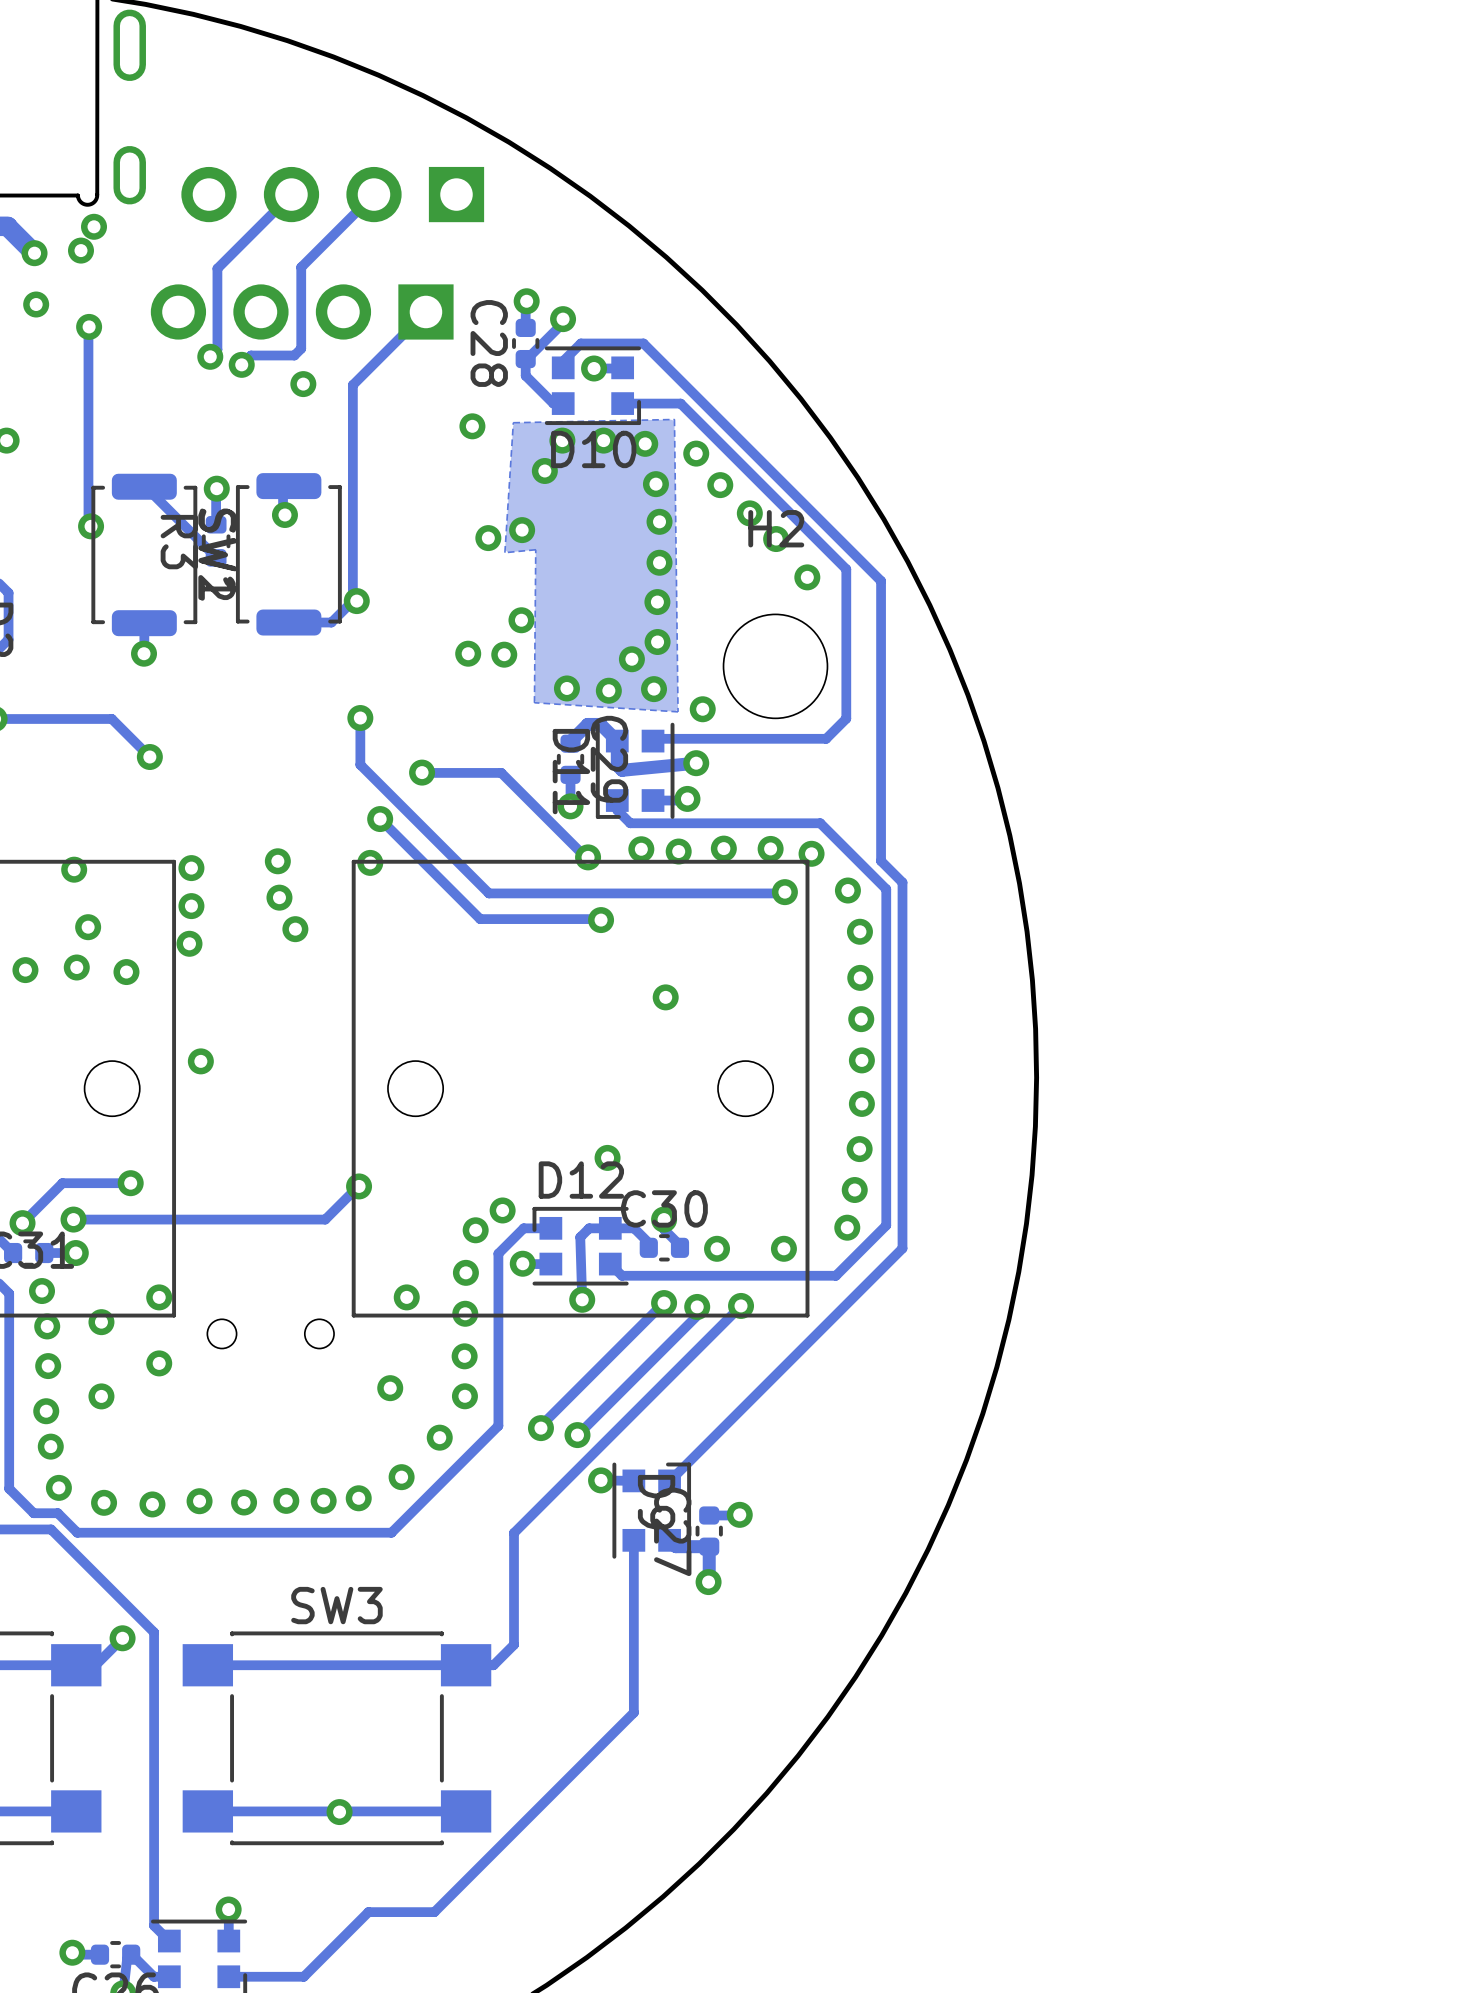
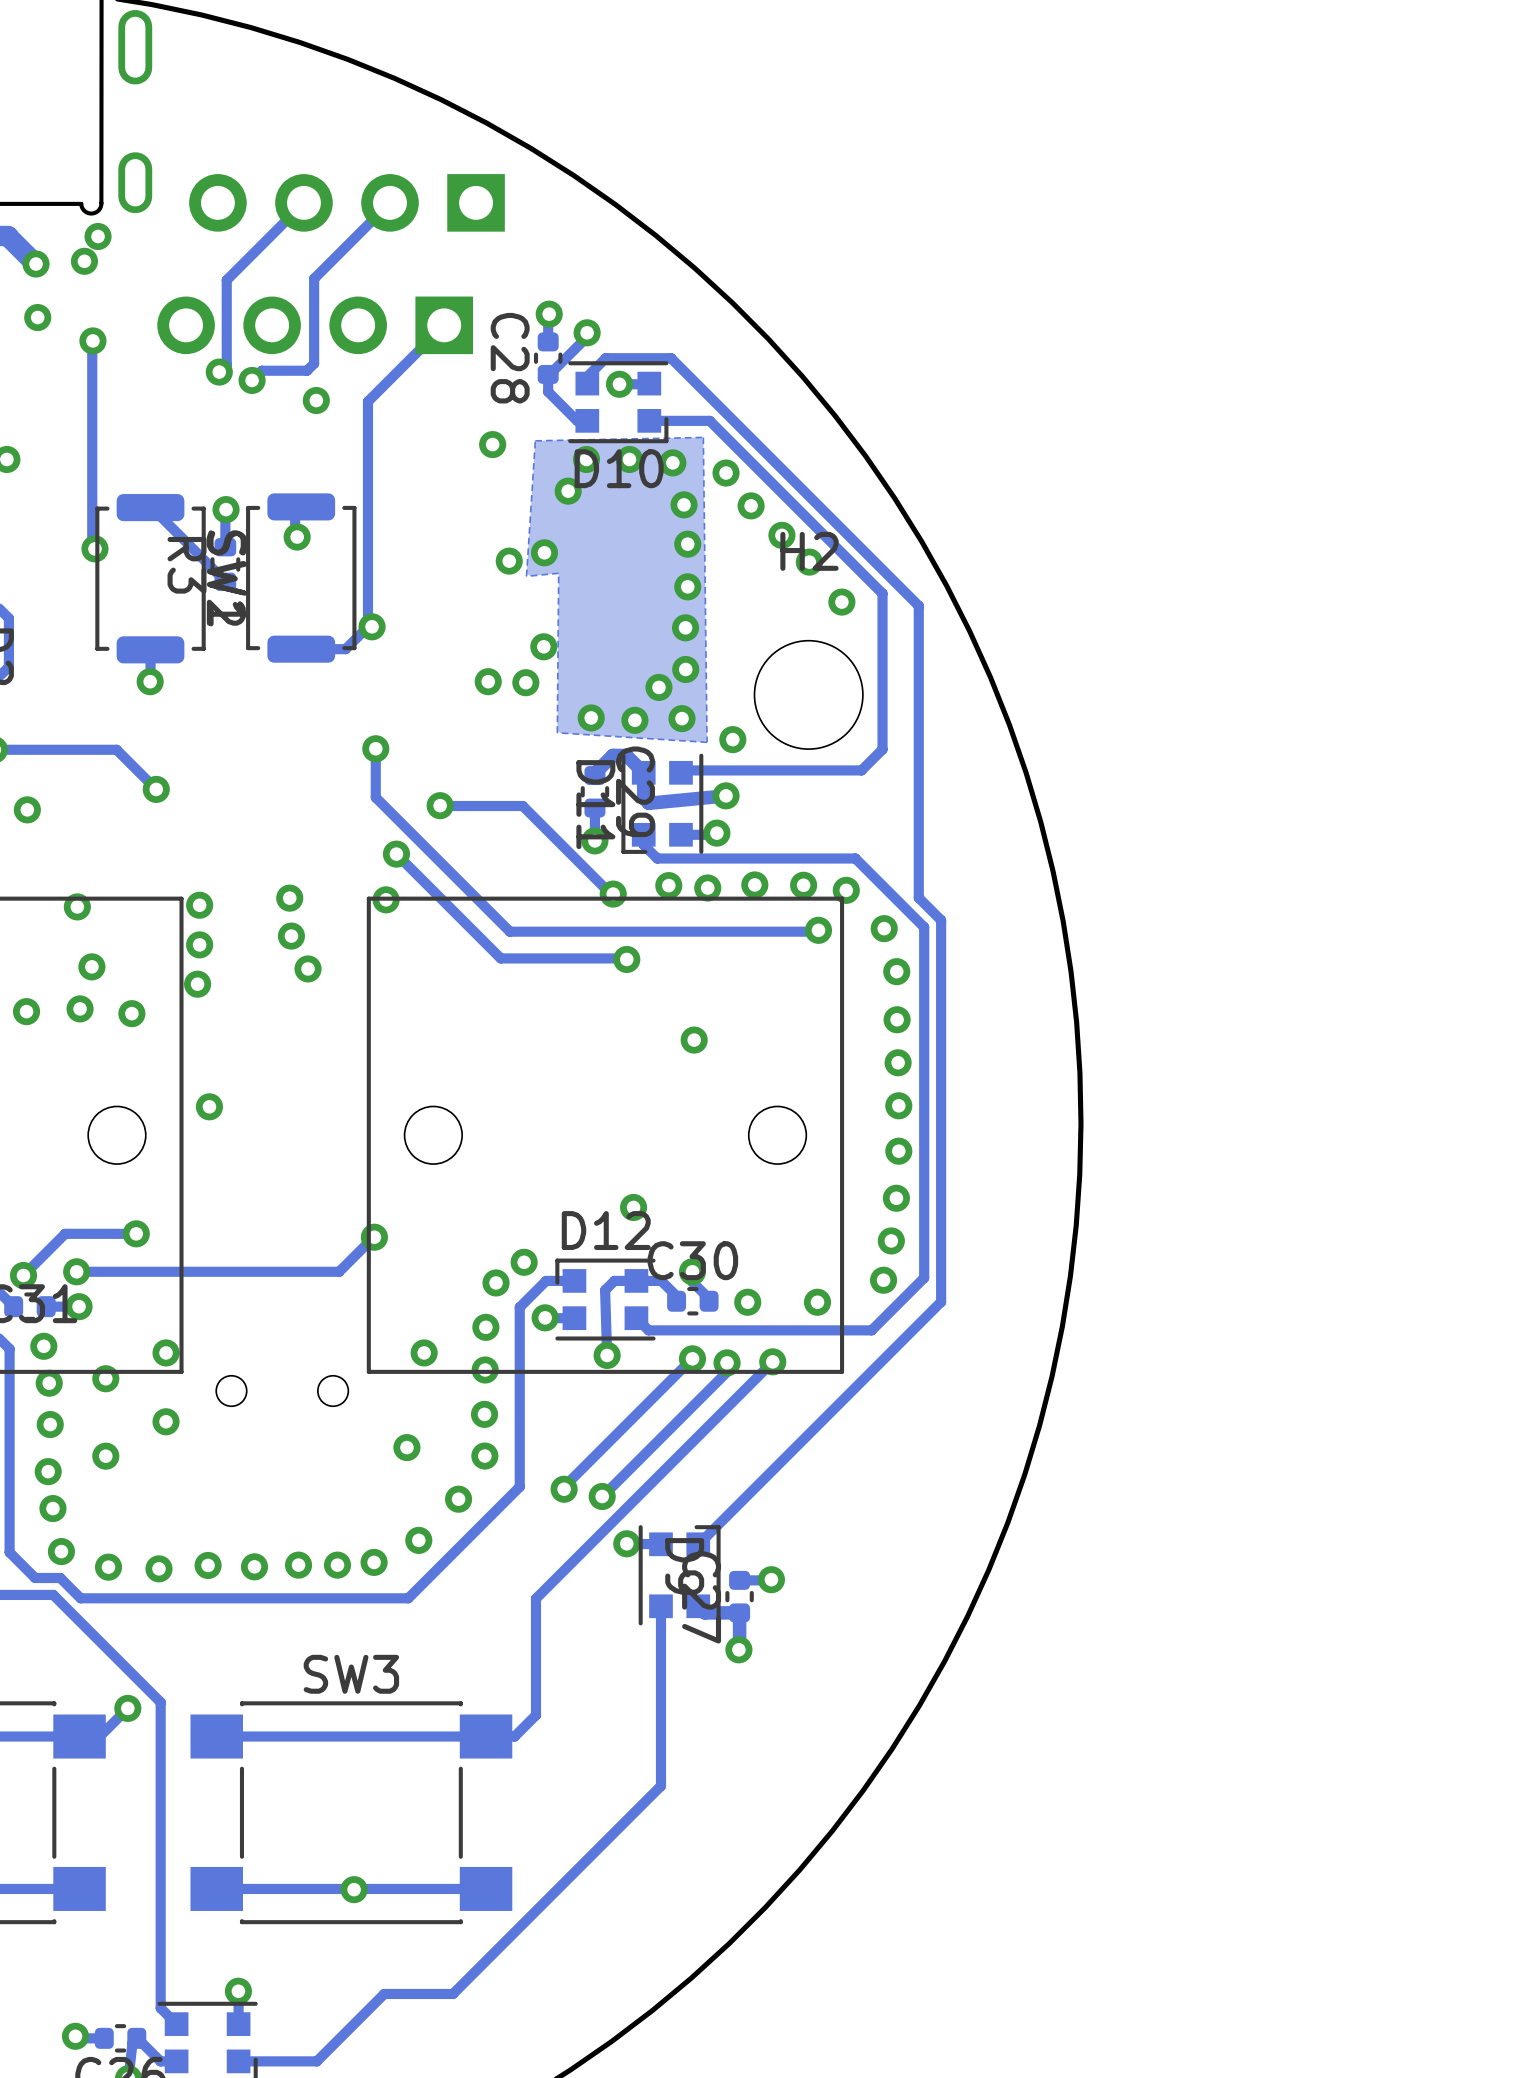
via: none -> (27, 809)

